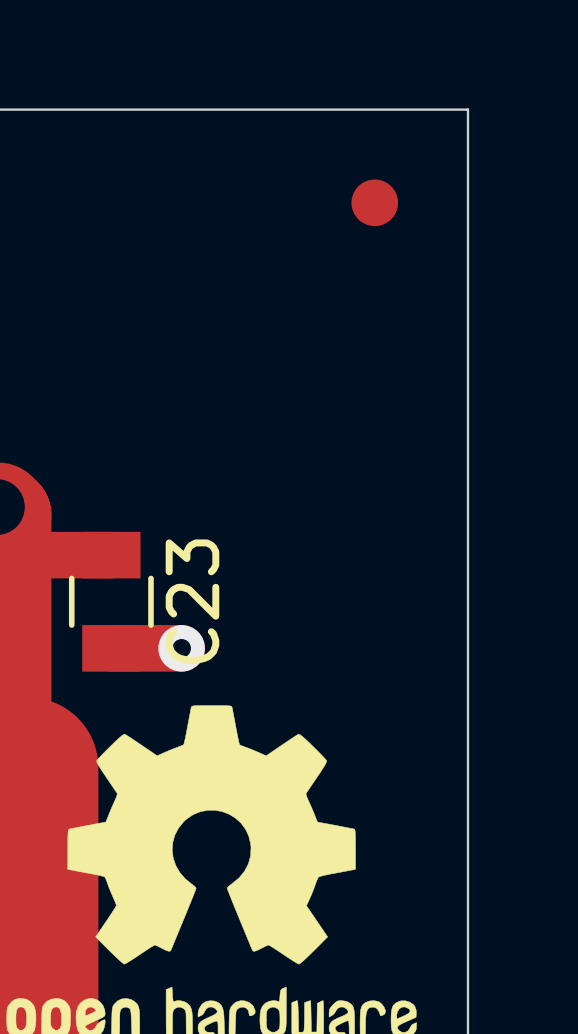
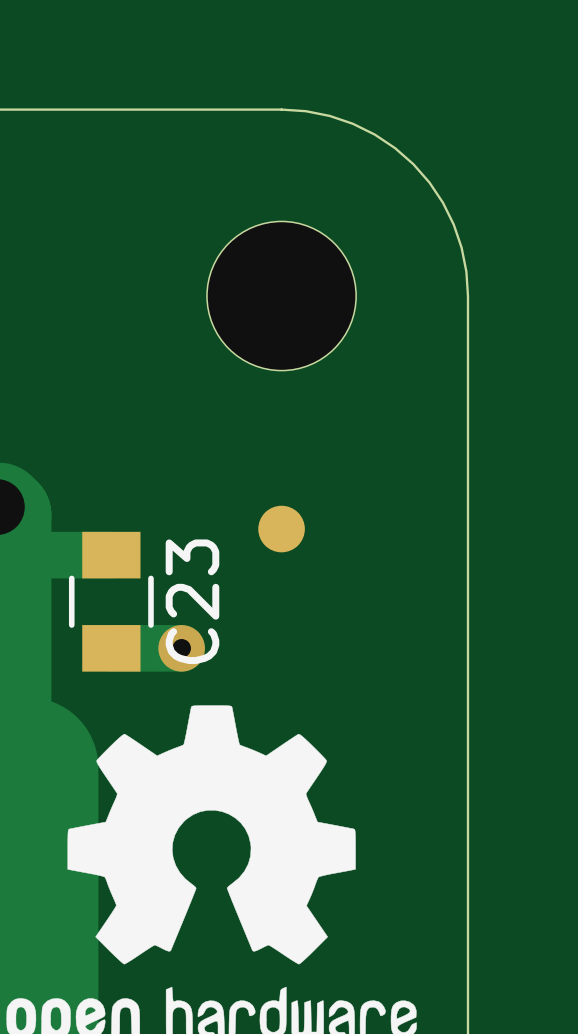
board edge: (281, 109) (467, 109) (467, 296) -> (281, 109) (305, 111) (329, 115) (352, 123) (374, 134) (395, 148) (413, 164) (429, 182) (443, 202) (453, 224) (461, 247) (466, 271) (467, 296)
part position: (374, 202) -> (281, 529)
part: none -> (281, 296)

